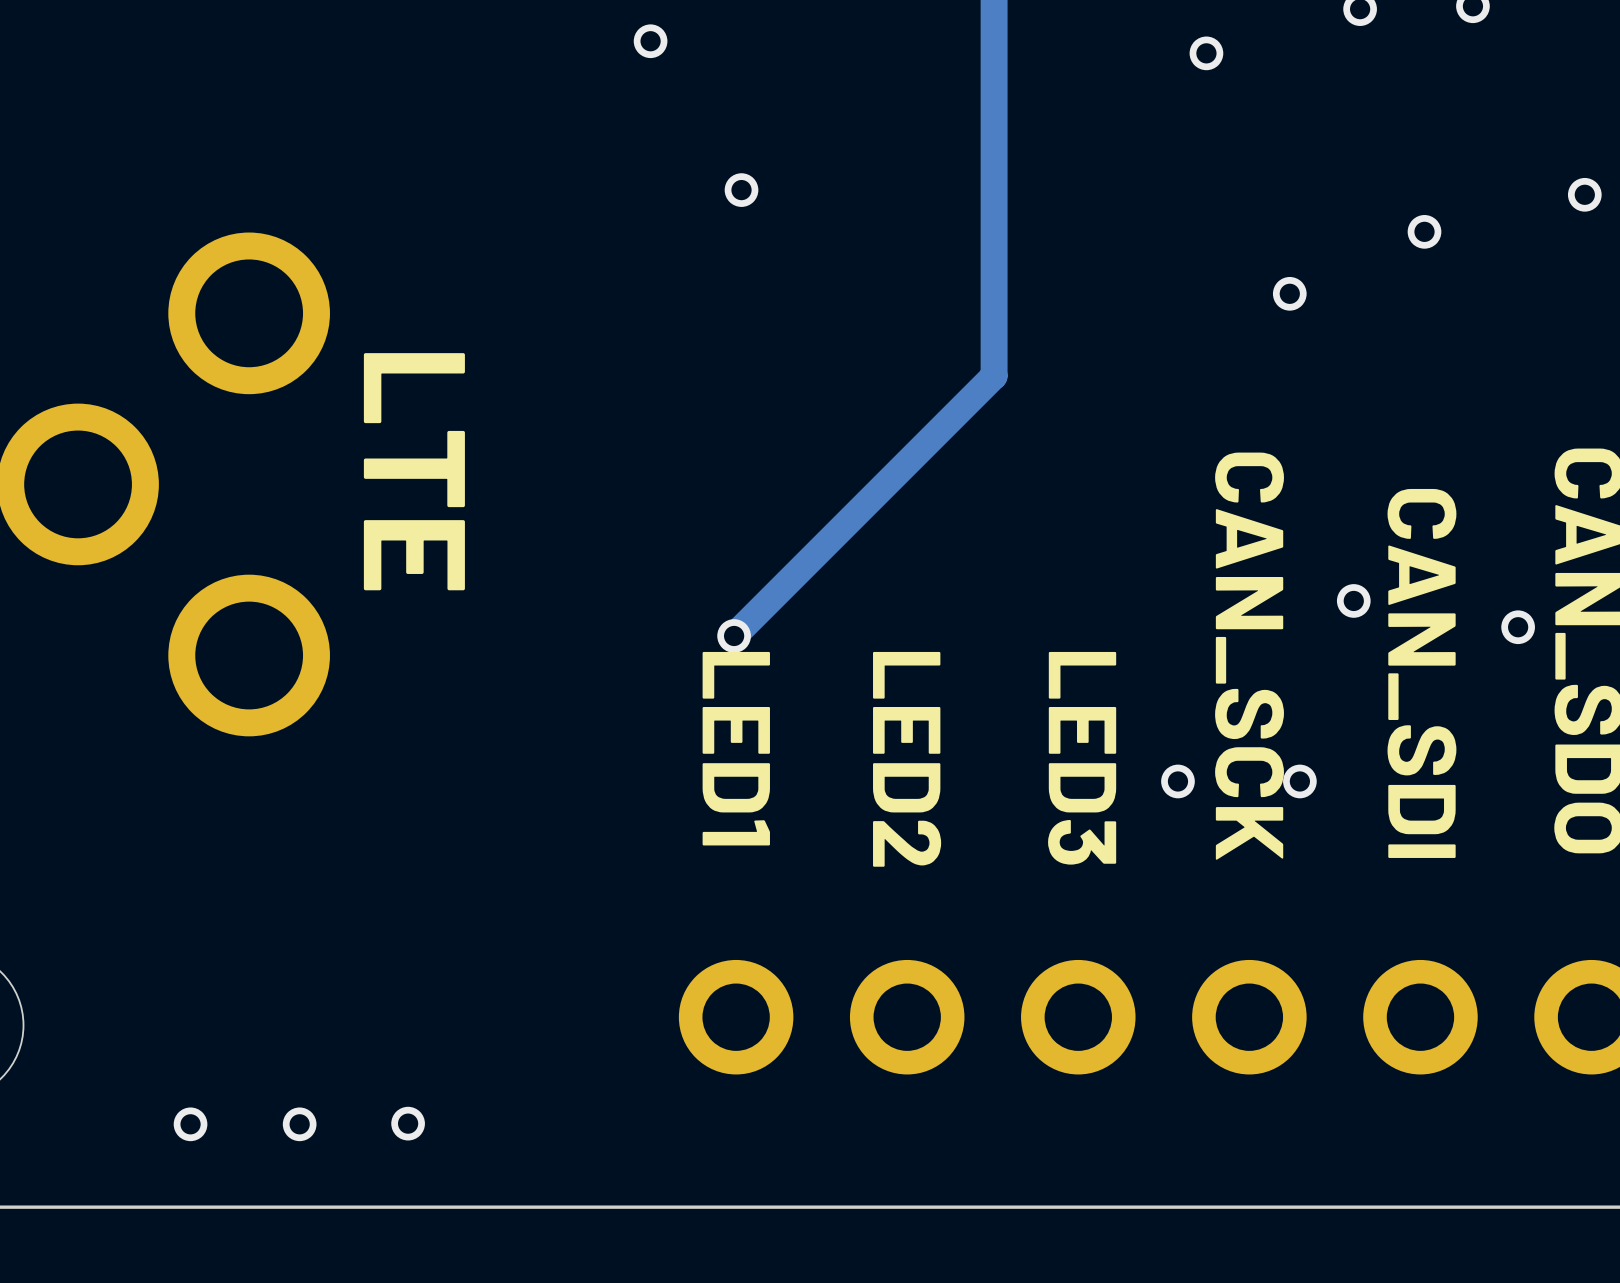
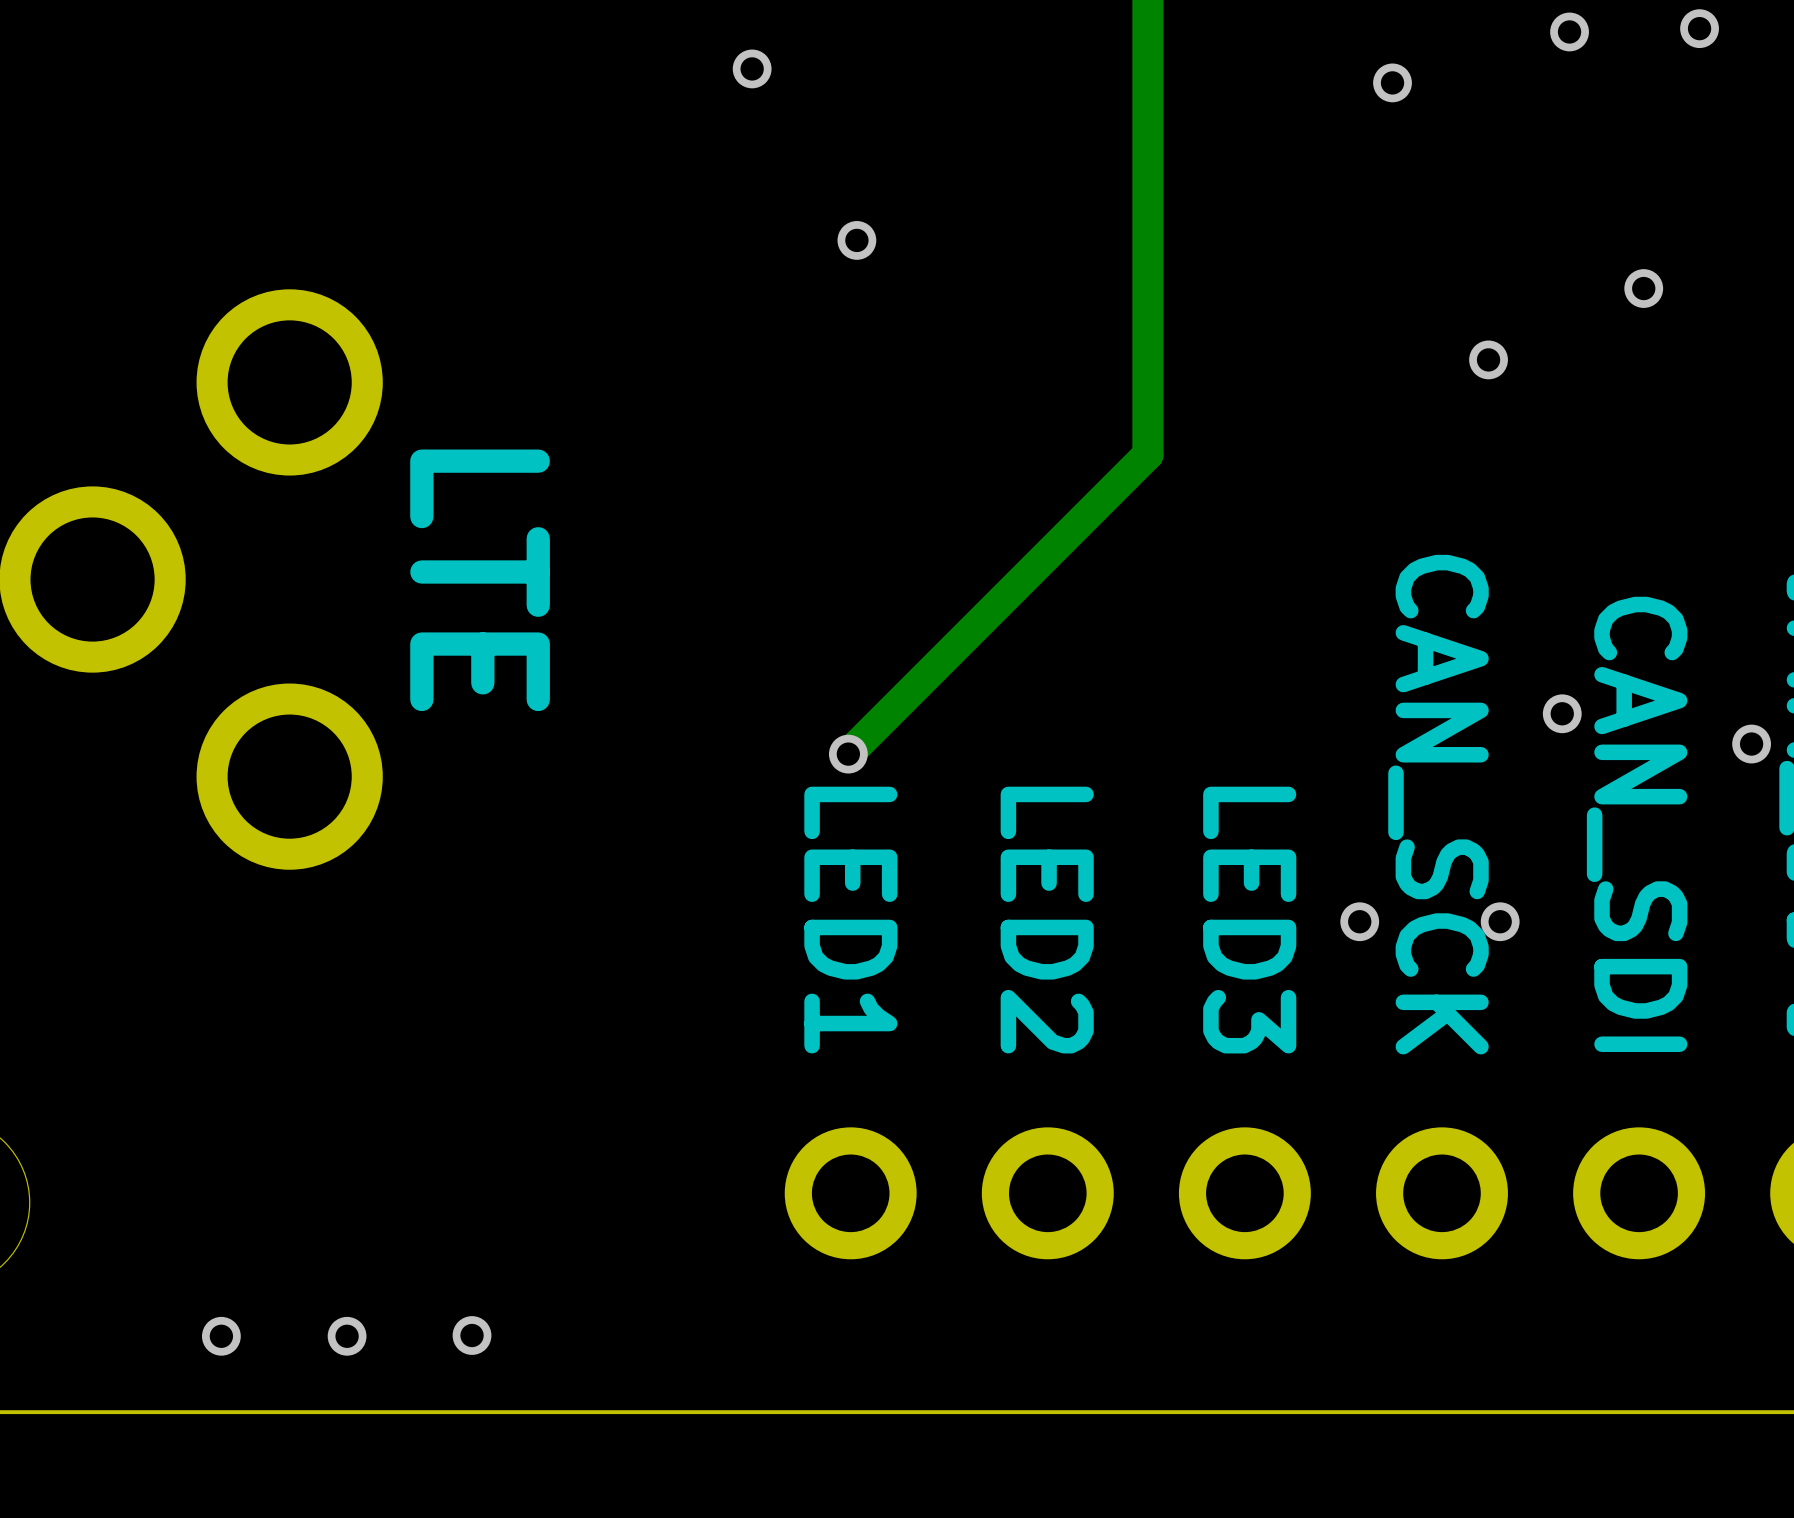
via position: (408, 1123) -> (472, 1335)
via position: (190, 1124) -> (221, 1336)
via position: (299, 1124) -> (347, 1336)

